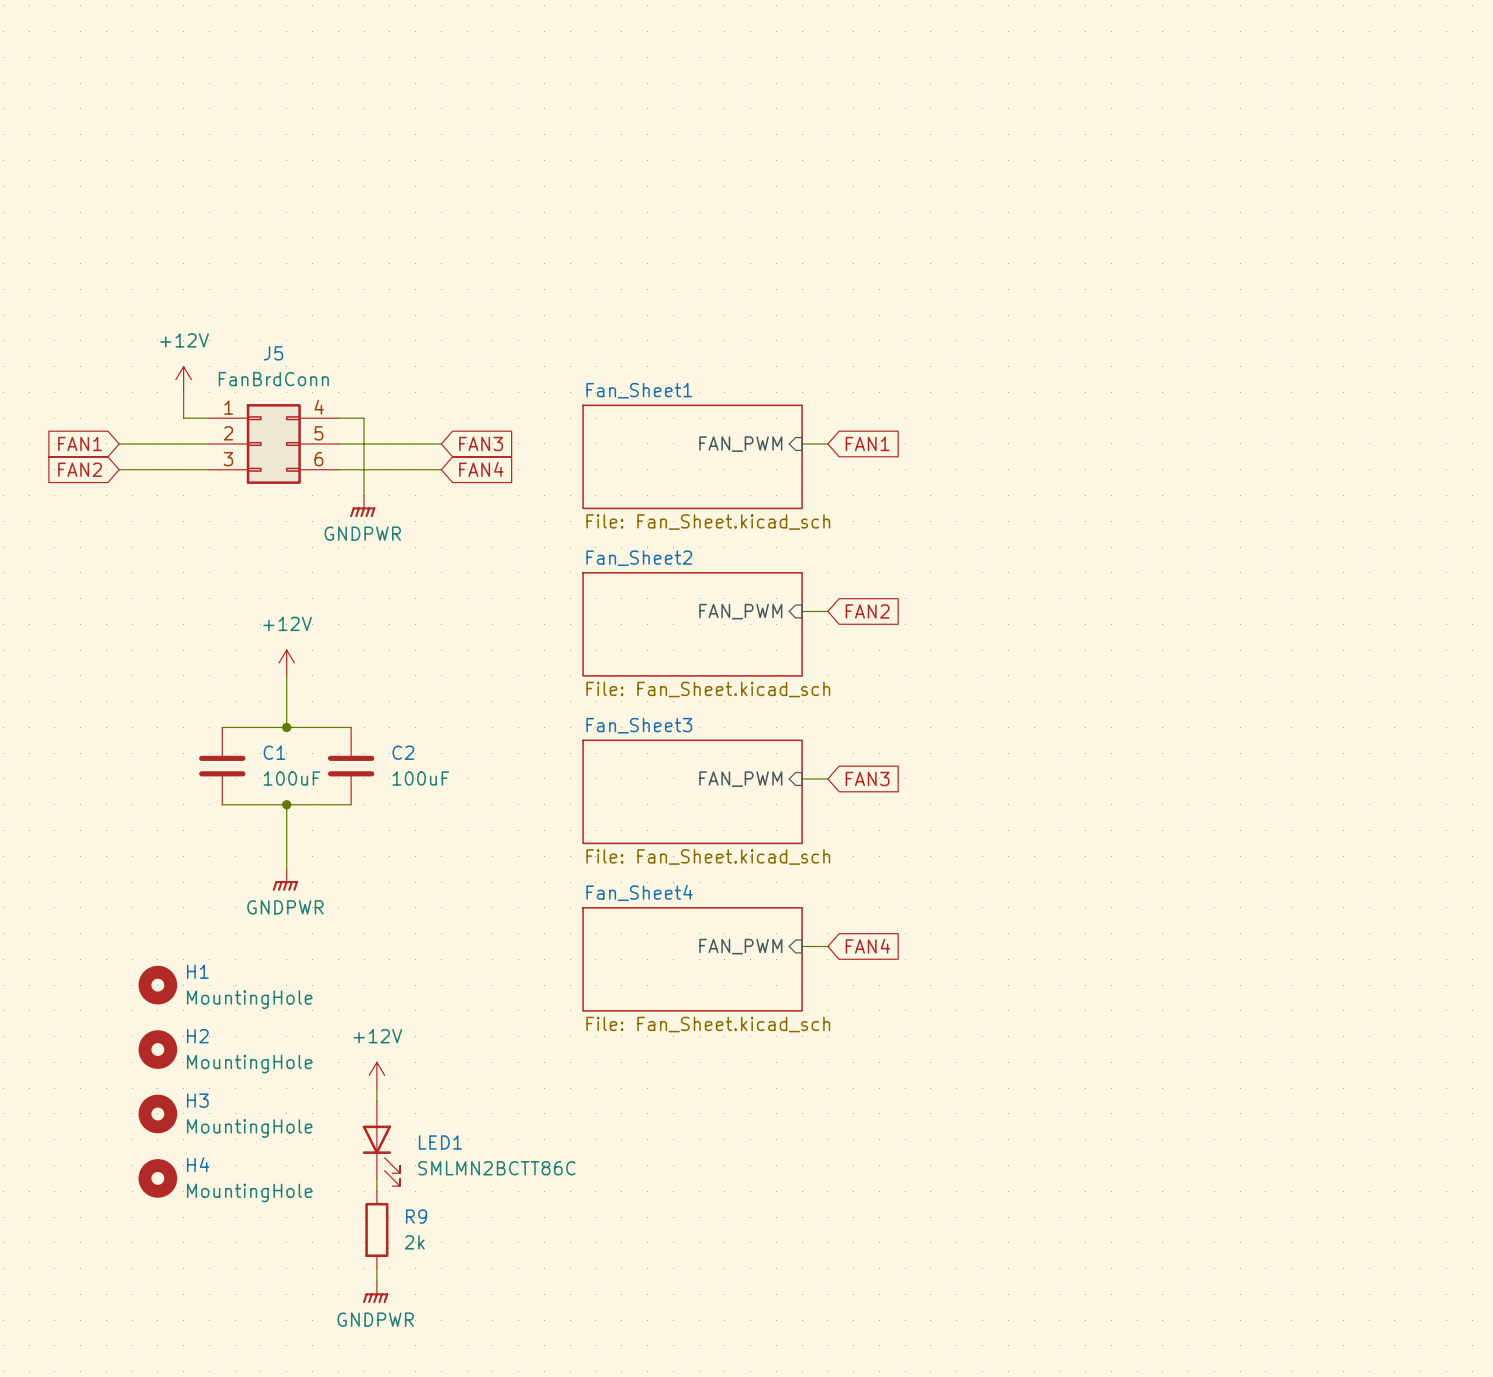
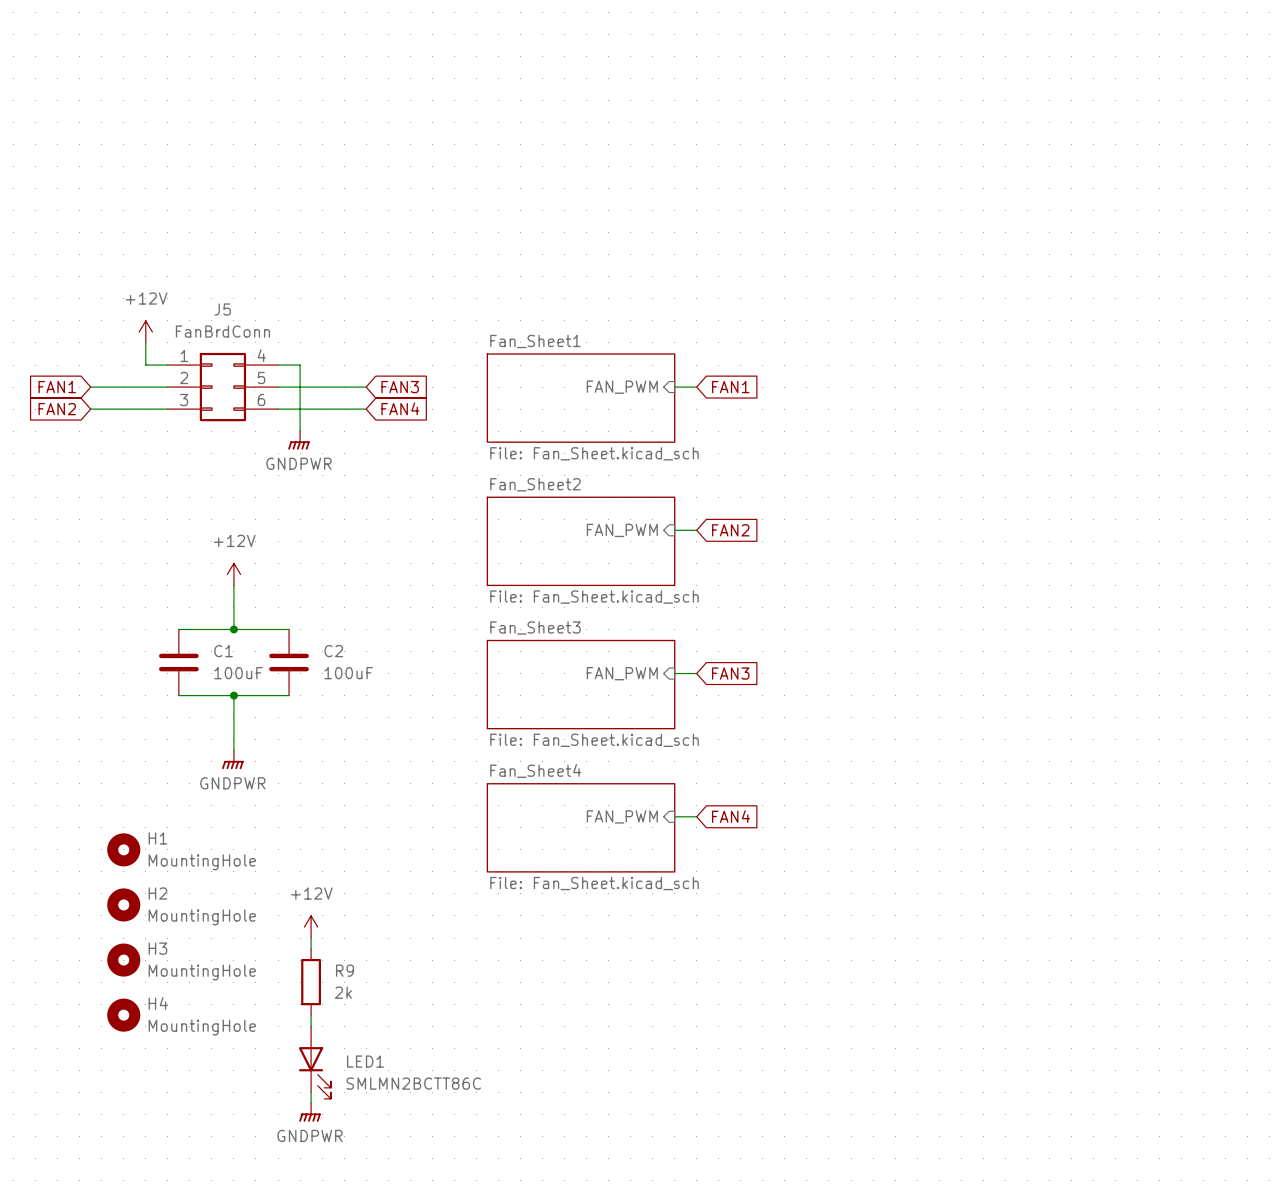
LED1 position: (381, 1143) -> (314, 1062)
R9 position: (376, 1229) -> (311, 982)

